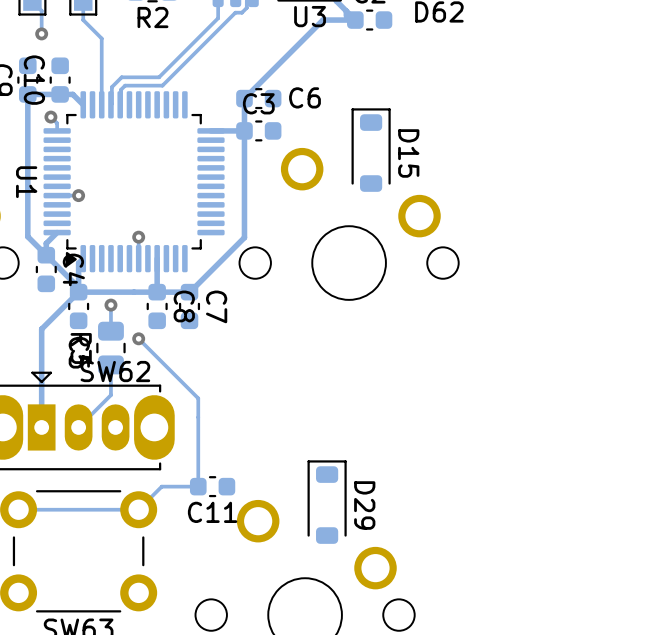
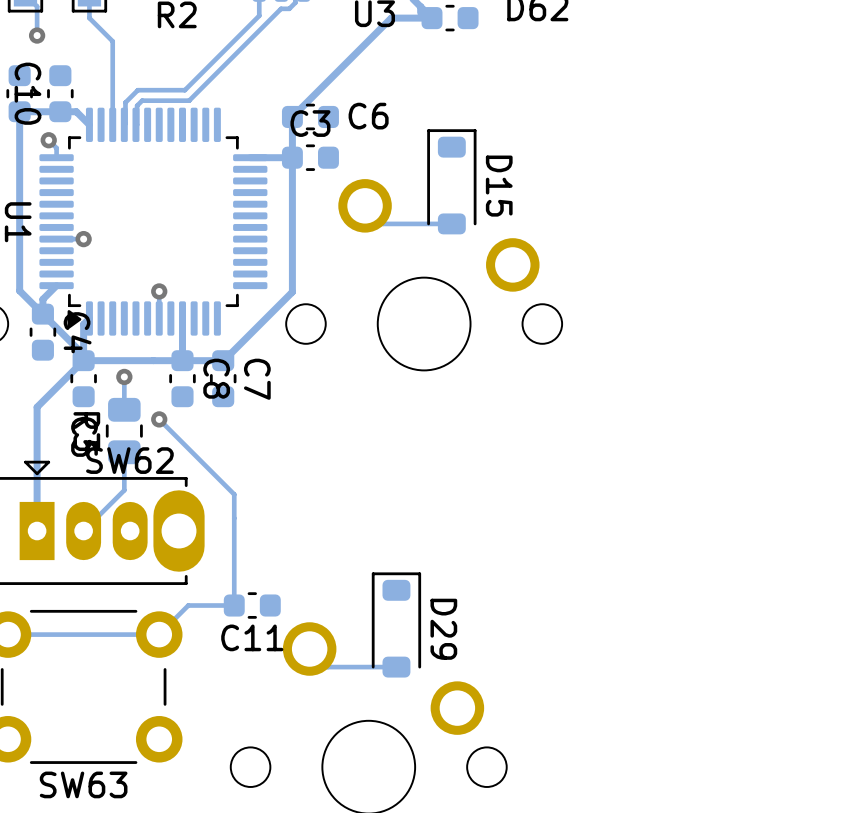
track: none -> (365, 205) (383, 223) (451, 223)
track: none -> (309, 649) (327, 667) (396, 667)

